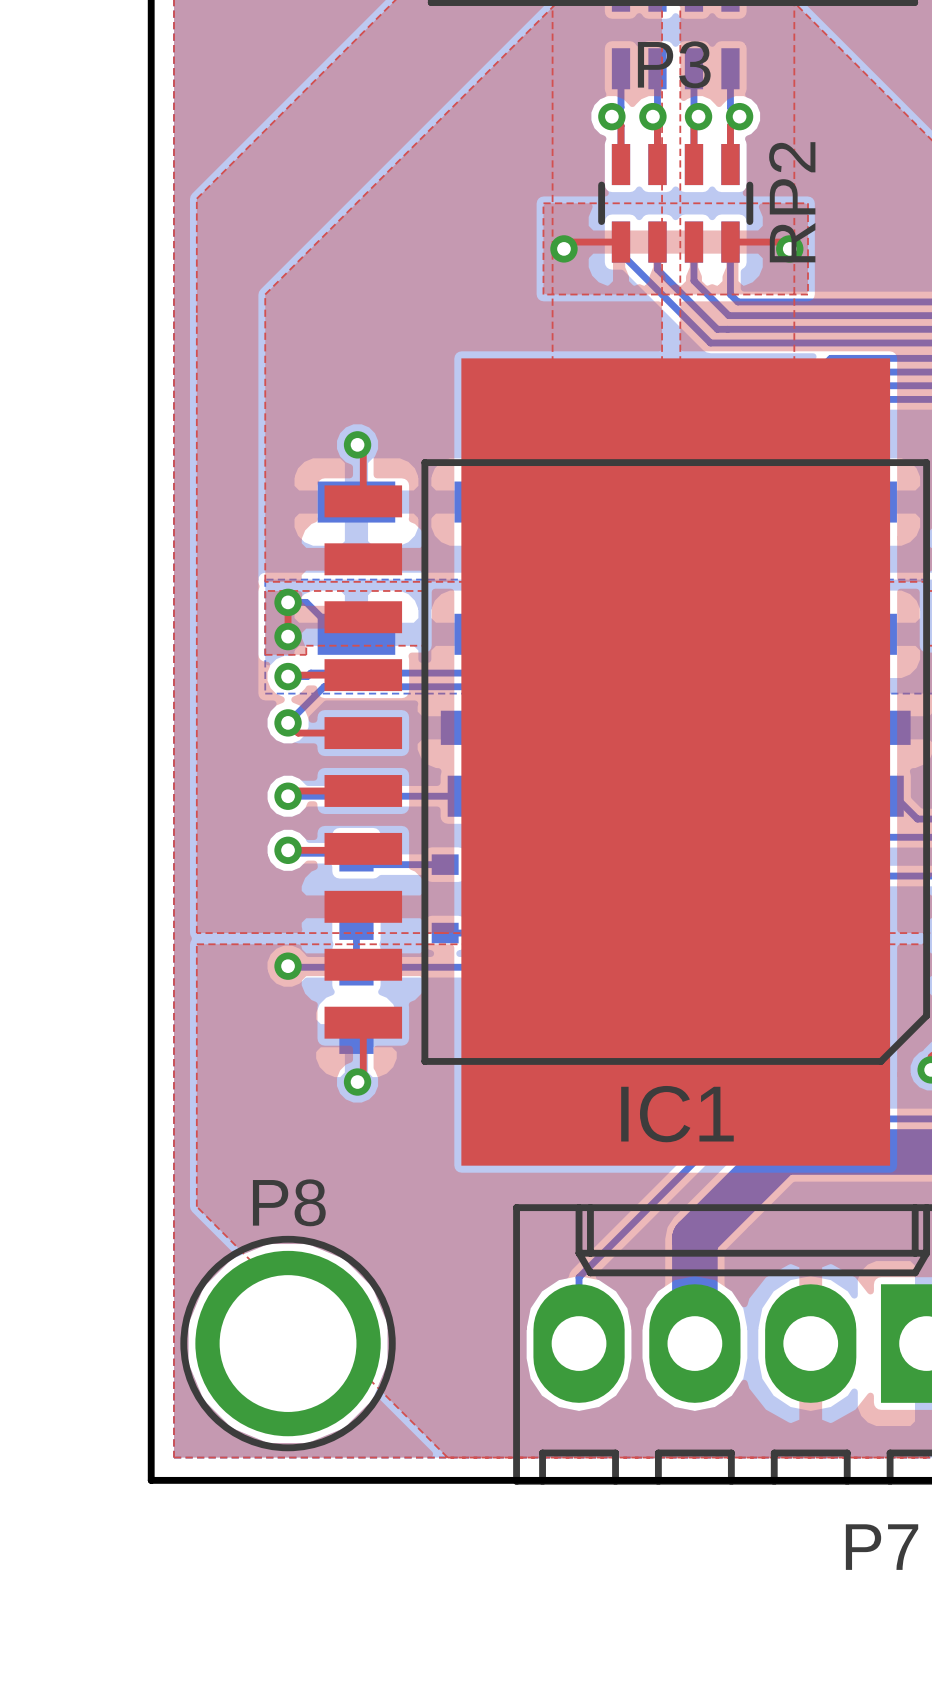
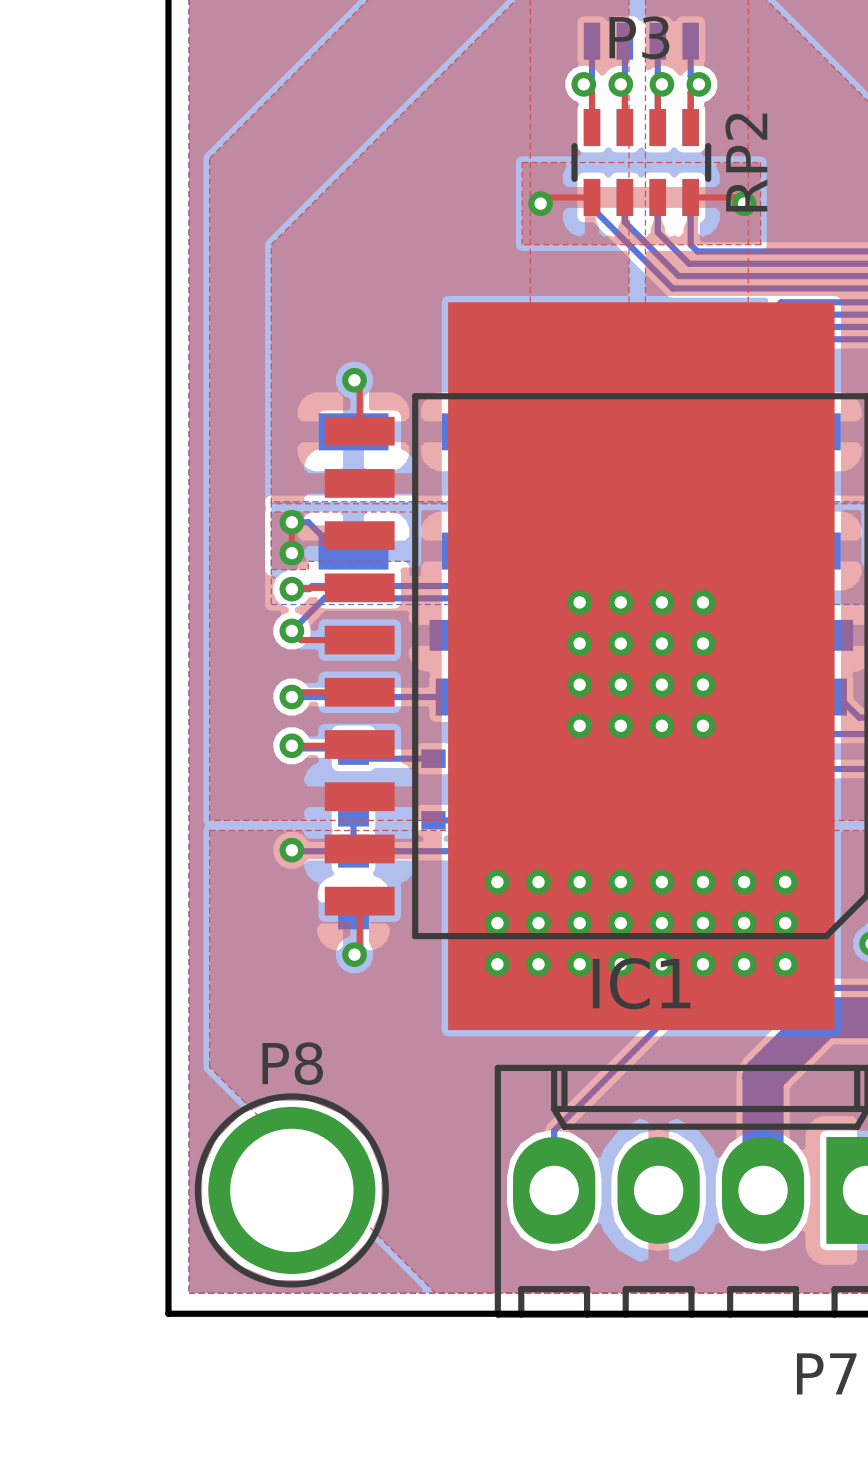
part: none -> (579, 602)
part: none -> (620, 602)
part: none -> (661, 602)
part: none -> (703, 602)
part: none -> (579, 643)
part: none -> (620, 643)
part: none -> (661, 643)
part: none -> (703, 643)
part: none -> (579, 684)
part: none -> (620, 684)
part: none -> (661, 684)
part: none -> (703, 684)
part: none -> (579, 725)
part: none -> (620, 725)
part: none -> (661, 725)
part: none -> (703, 725)
part: none -> (497, 882)
part: none -> (538, 882)
part: none -> (579, 882)
part: none -> (620, 882)
part: none -> (661, 882)
part: none -> (703, 882)
part: none -> (744, 882)
part: none -> (785, 882)
part: none -> (497, 923)
part: none -> (538, 923)
part: none -> (579, 923)
part: none -> (620, 923)
part: none -> (661, 923)
part: none -> (703, 923)
part: none -> (744, 923)
part: none -> (785, 923)
part: none -> (497, 964)
part: none -> (538, 964)
part: none -> (579, 964)
part: none -> (620, 964)
part: none -> (661, 964)
part: none -> (703, 964)
part: none -> (744, 964)
part: none -> (785, 964)
bottom track: (876, 1151) (781, 1151) (694, 1238) (694, 1343) -> (822, 1017) (763, 1076) (763, 1190)

